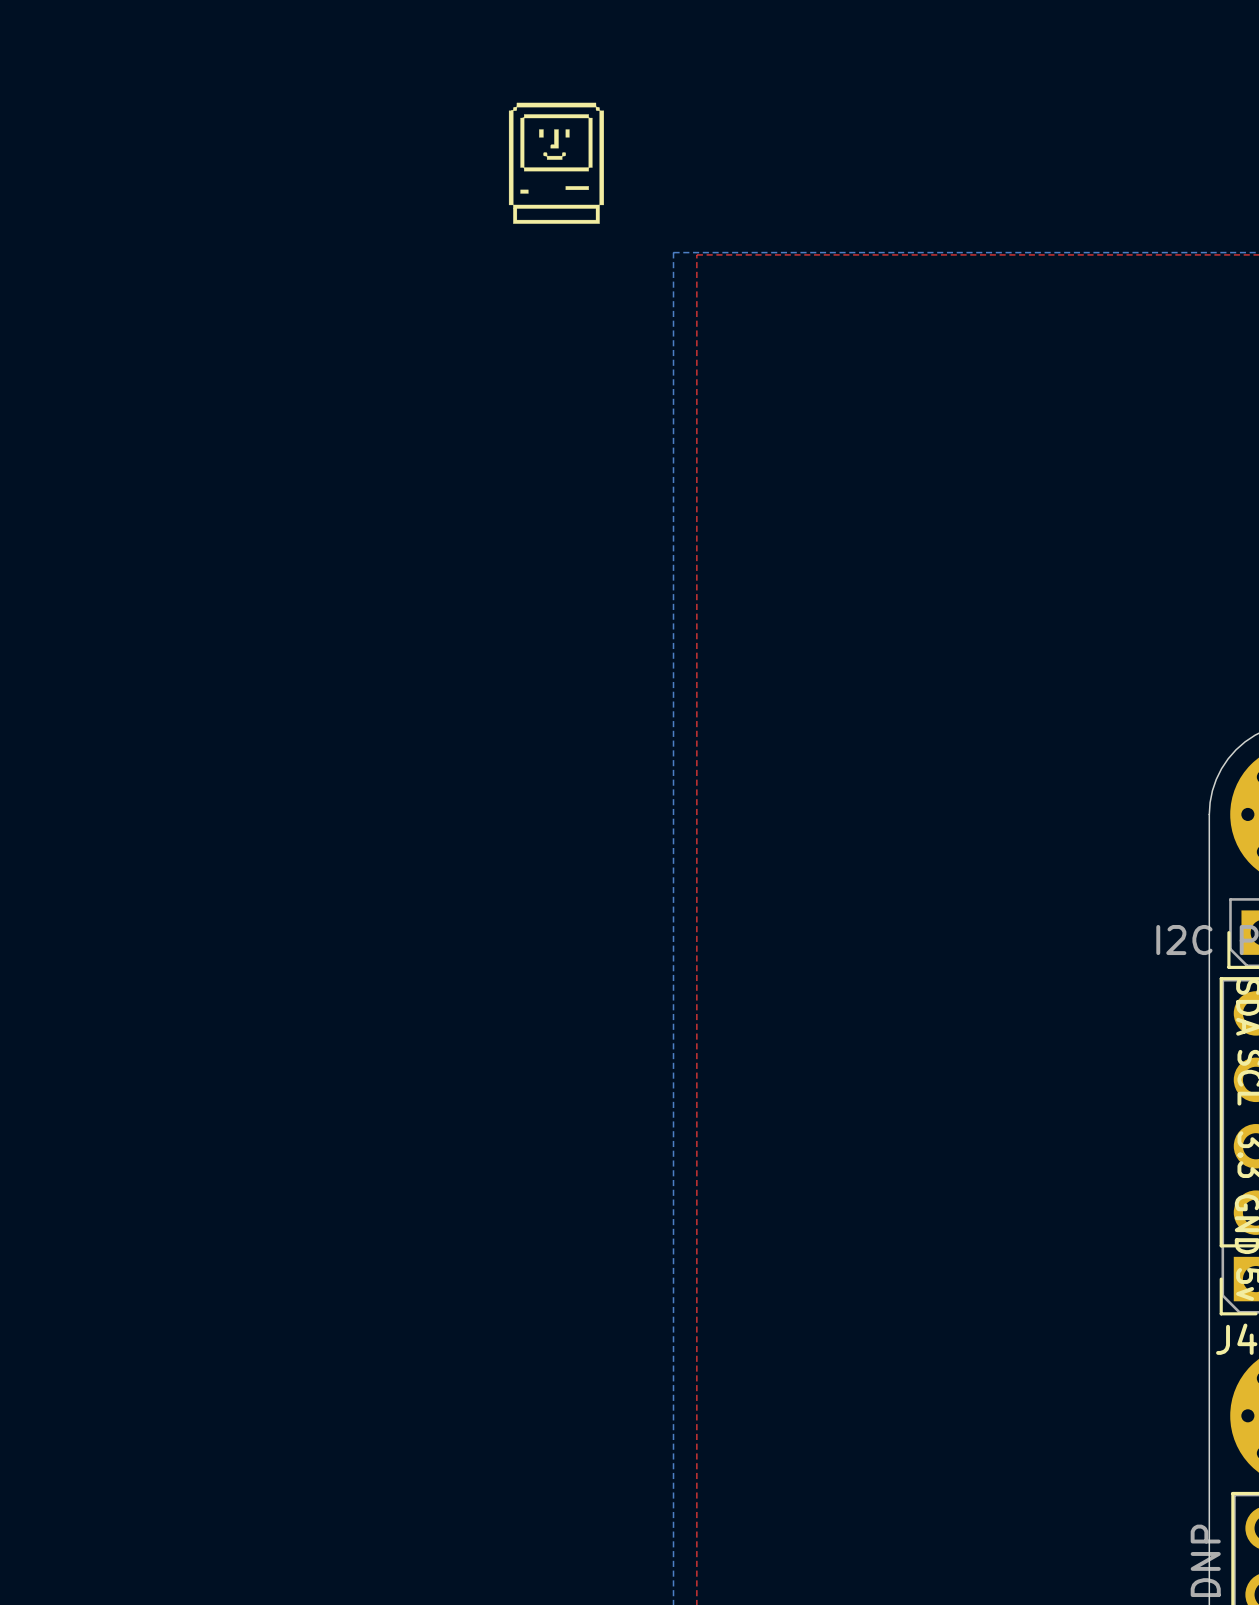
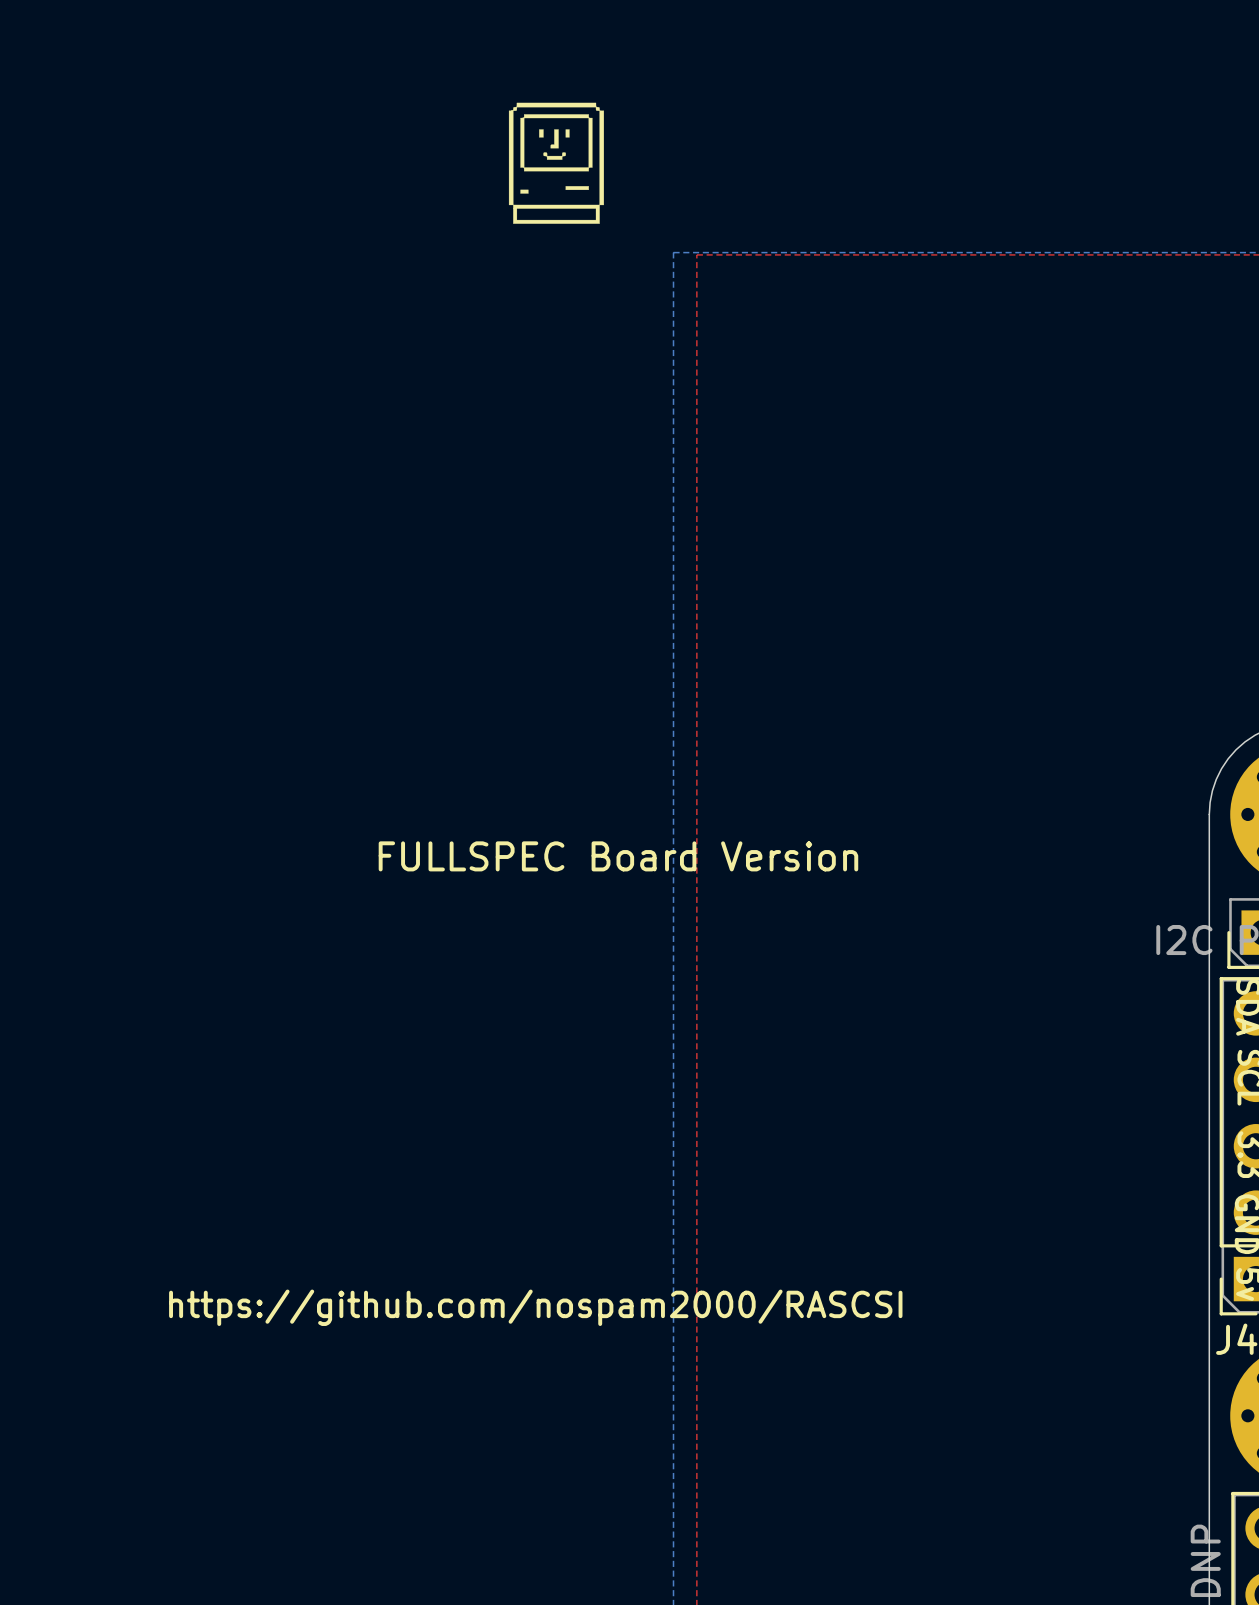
text: none -> FULLSPEC Board Version (618, 856)
text: none -> https://github.com/nospam2000/RASCSI (535, 1307)

